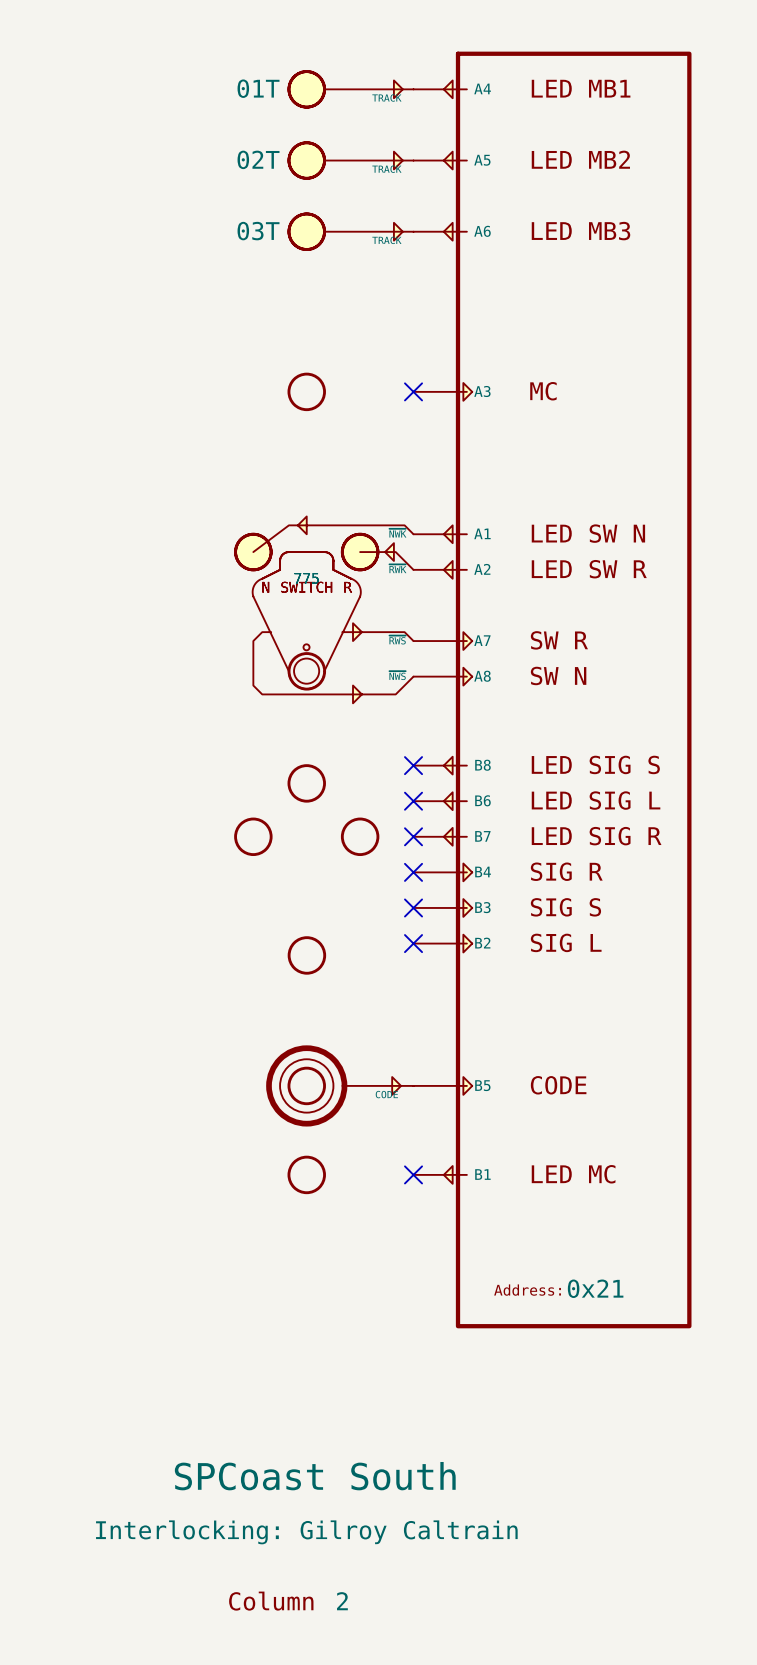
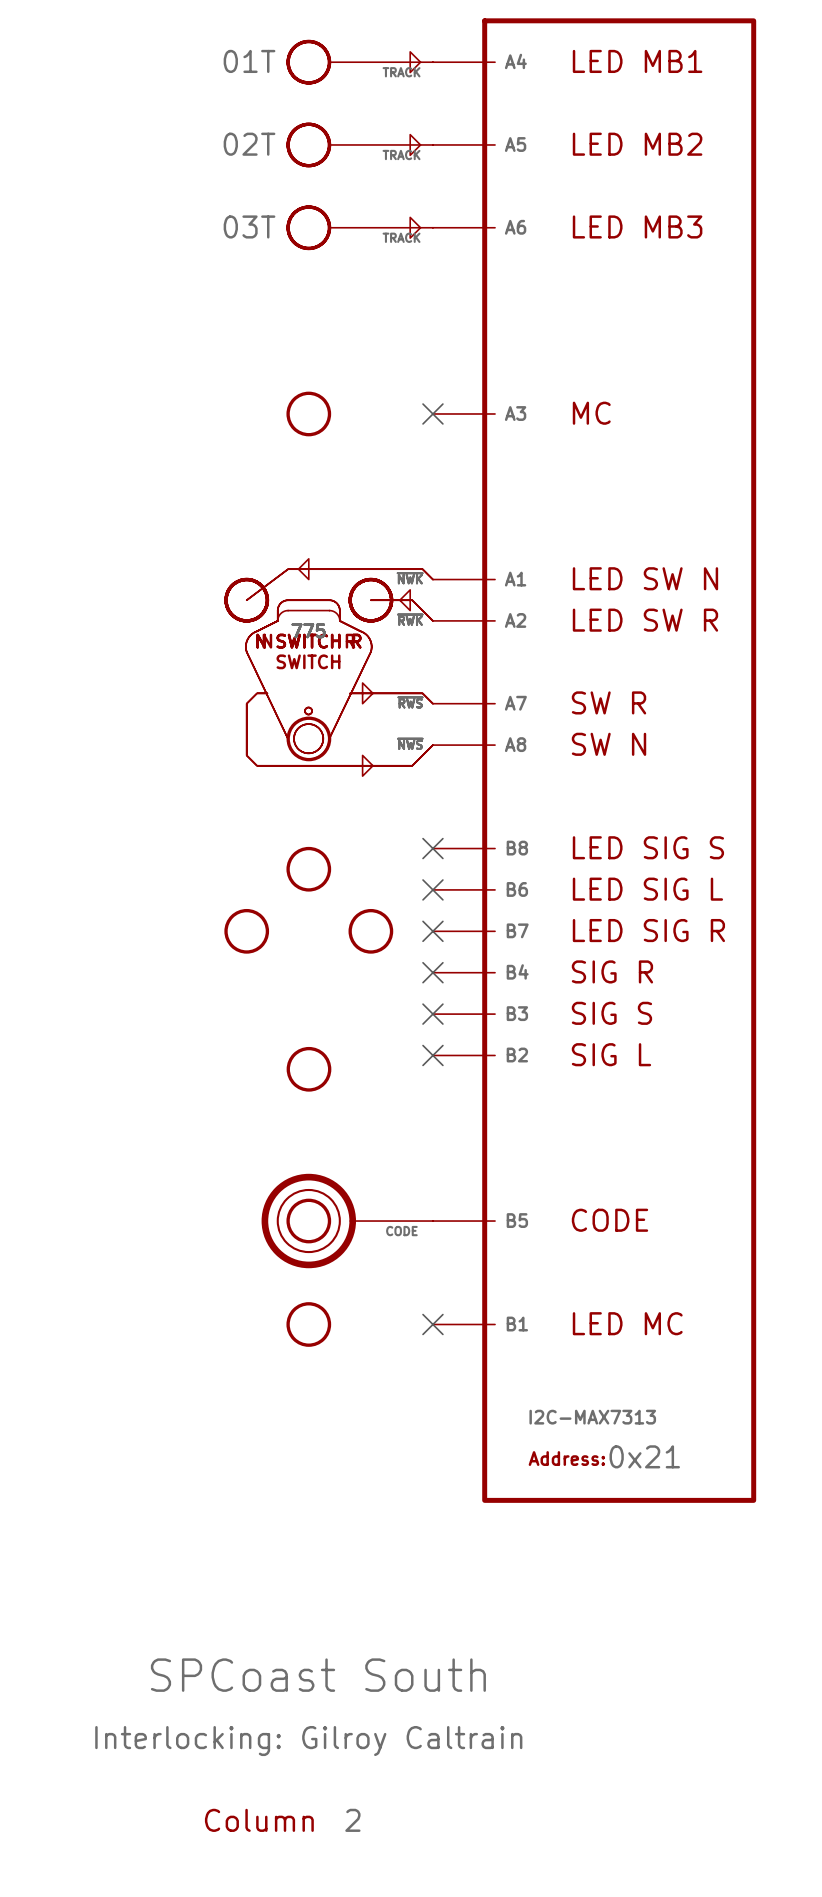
part symbol: [413, 51, 692, 1329] -> [432, 18, 757, 1503]
part: none -> 775 (328, 667)
part symbol: [266, 1045, 414, 1127] -> [261, 1173, 433, 1269]
part text: none -> I2C-MAX7313 (592, 1417)

